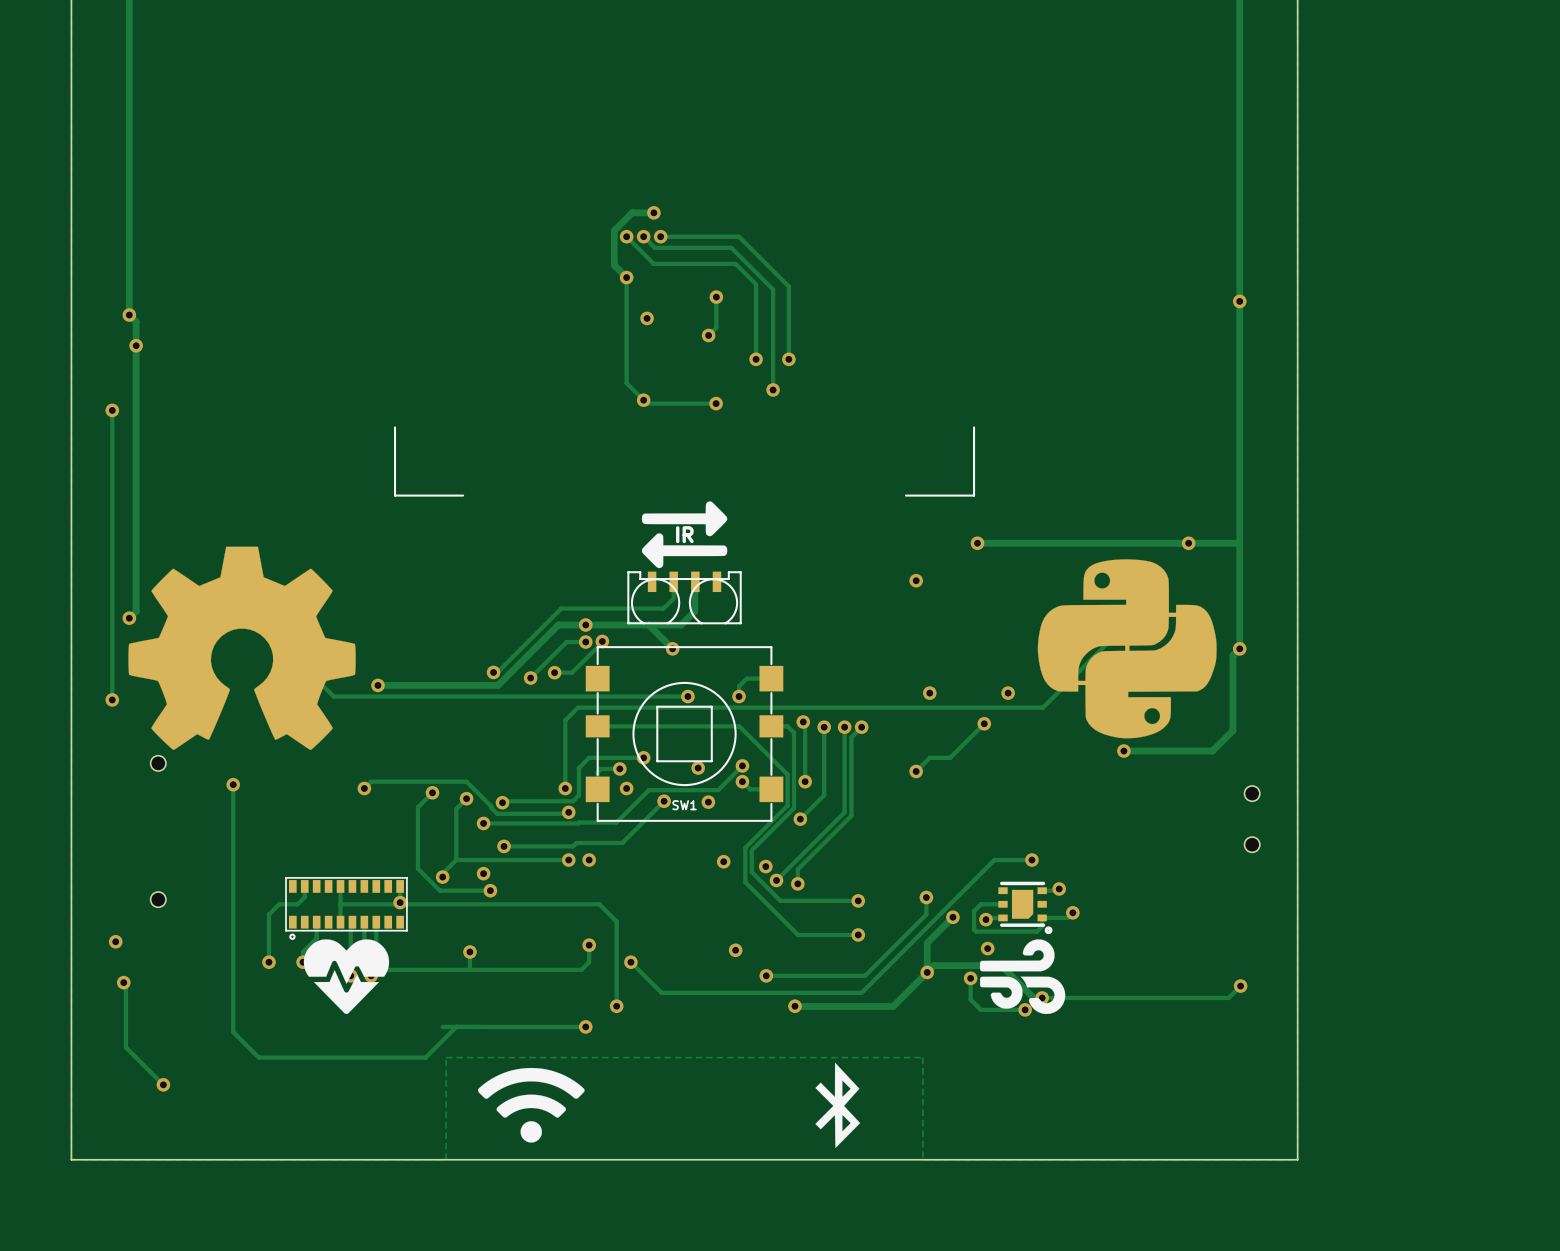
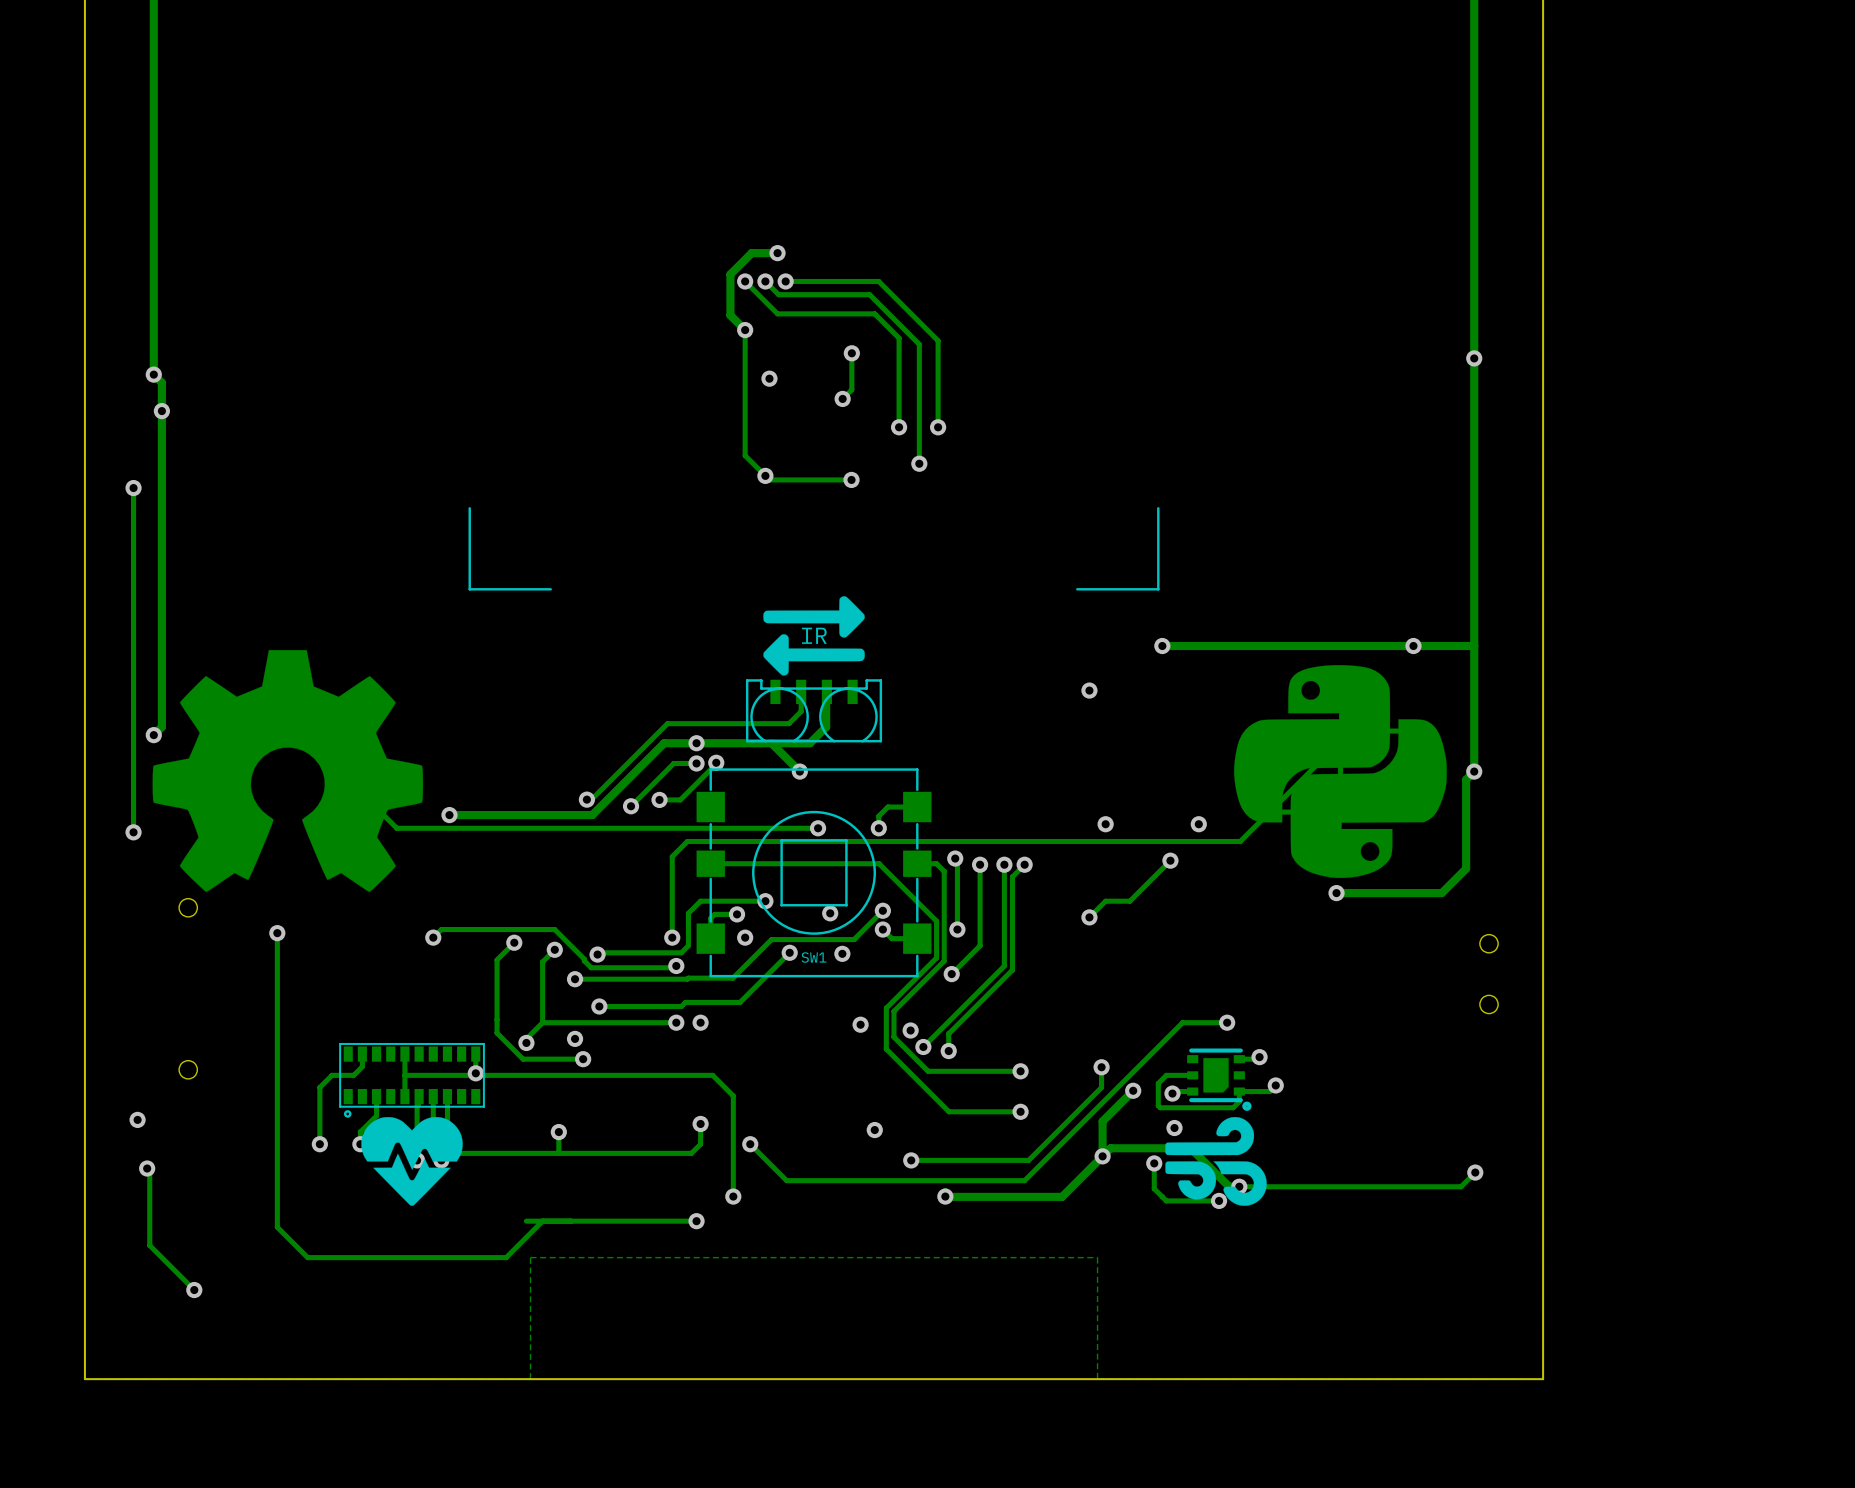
drawing: [815, 1062, 861, 1149] -> none
drawing: [477, 1067, 585, 1143] -> none

